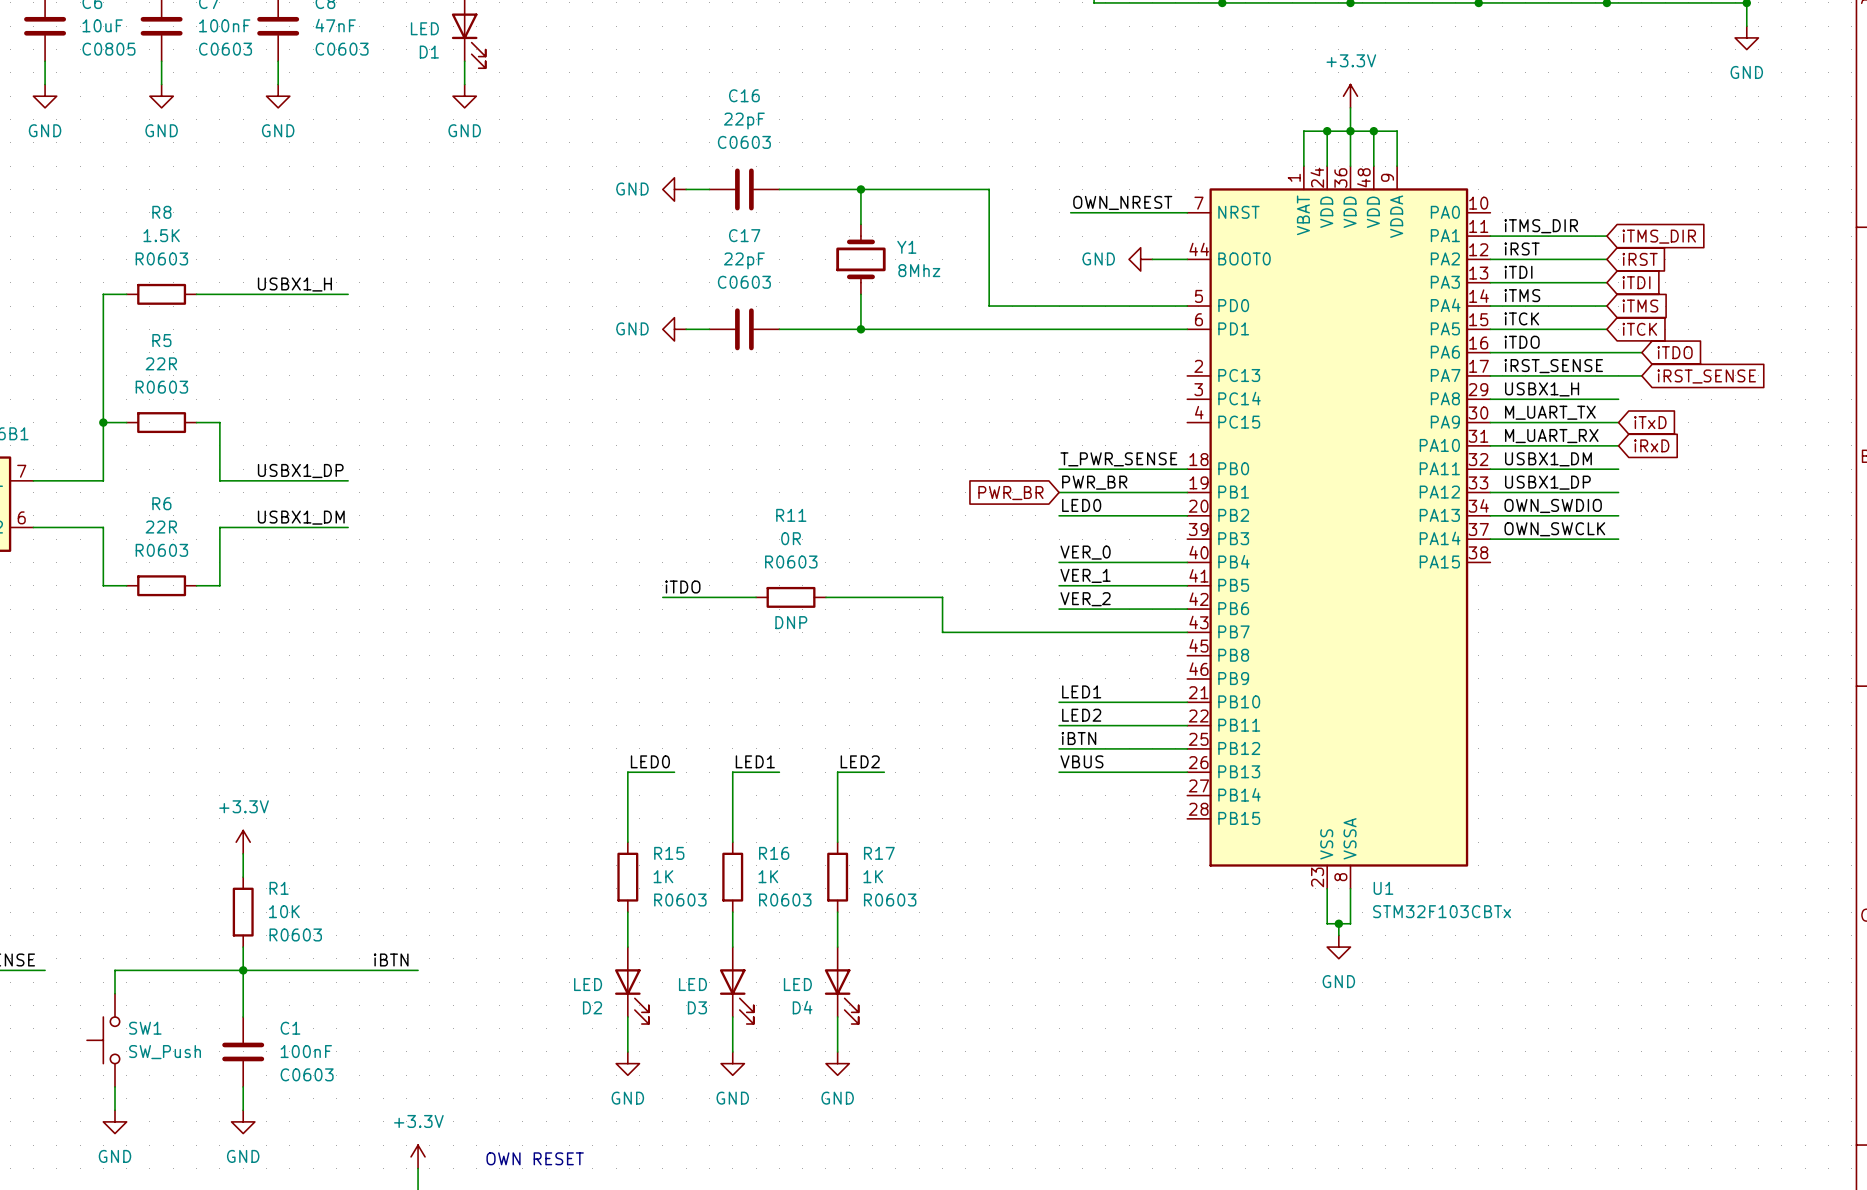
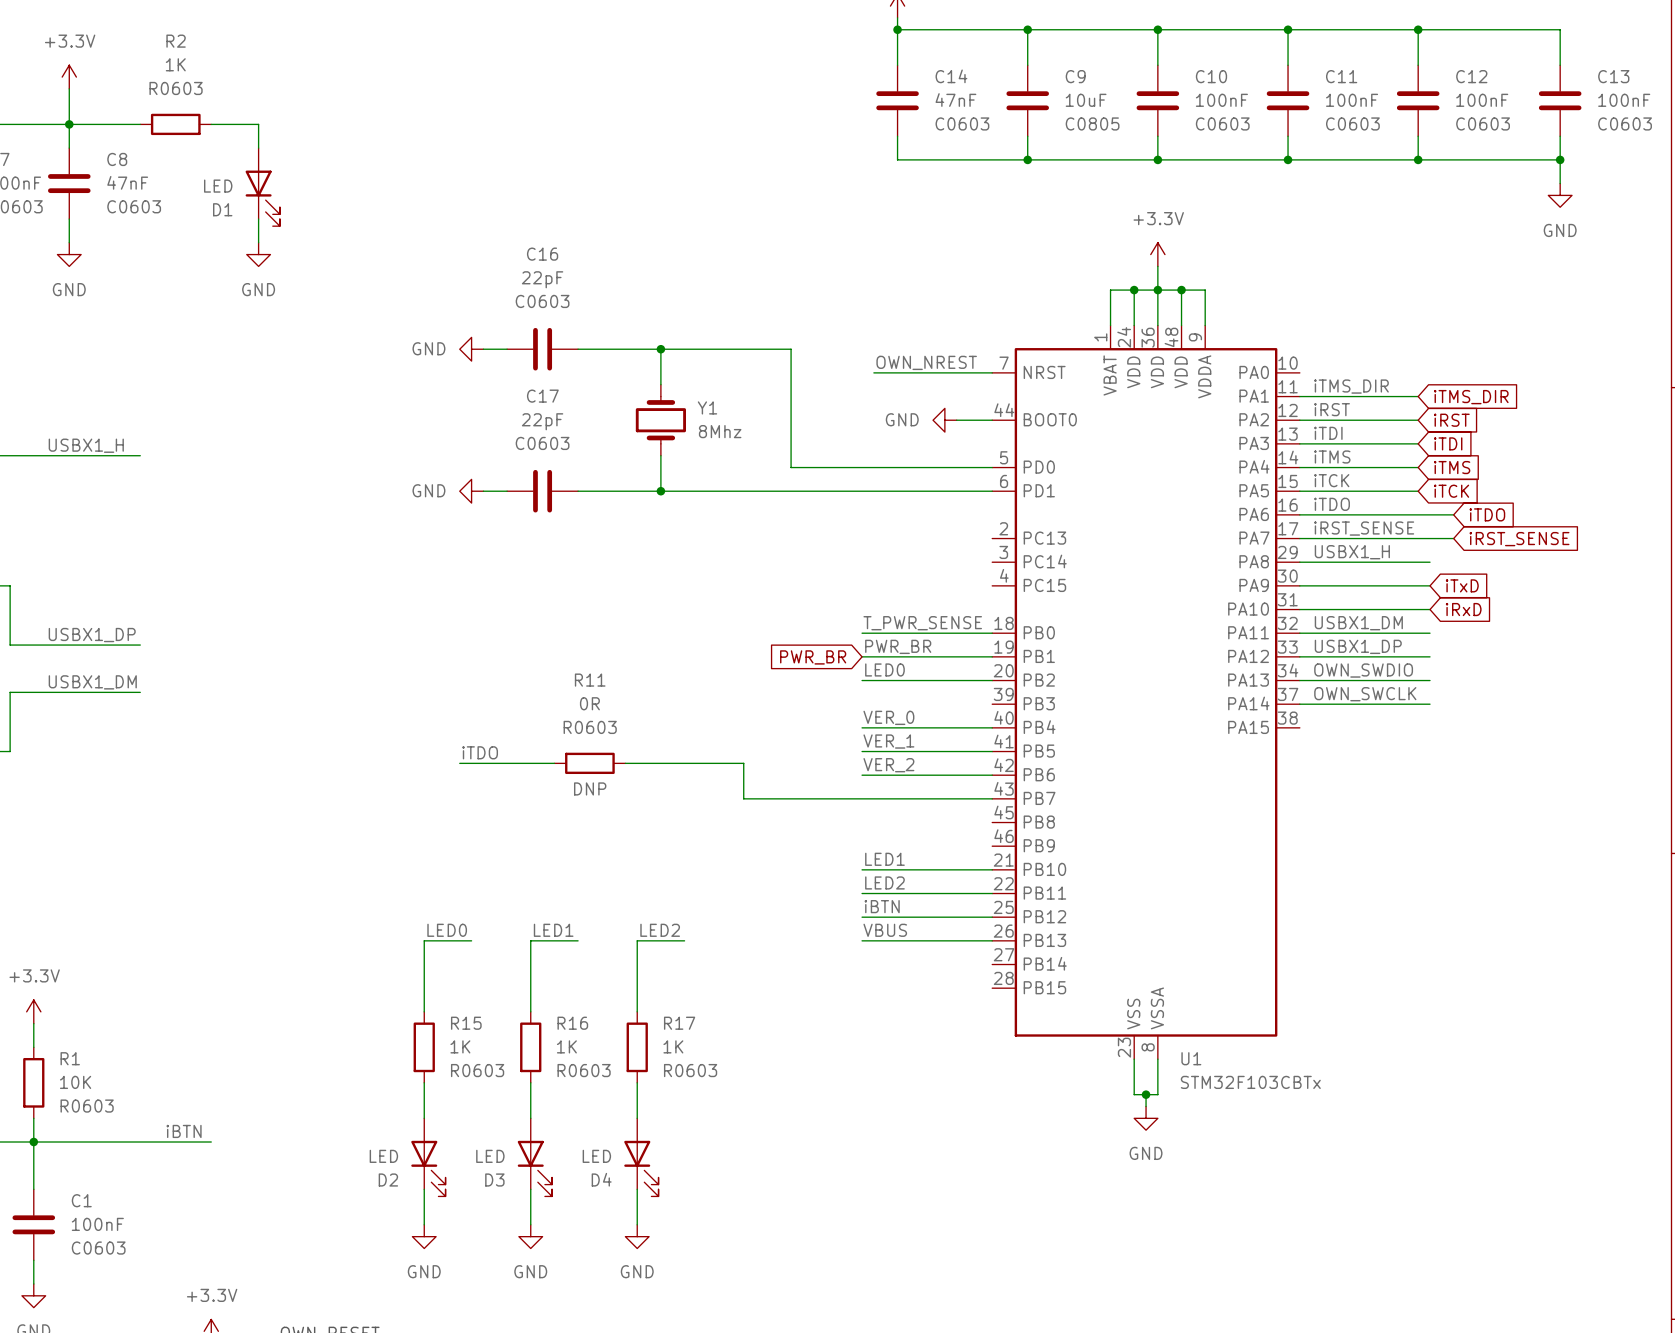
label: M_UART_TX (1550, 412) -> none
label: M_UART_RX (1551, 436) -> none

